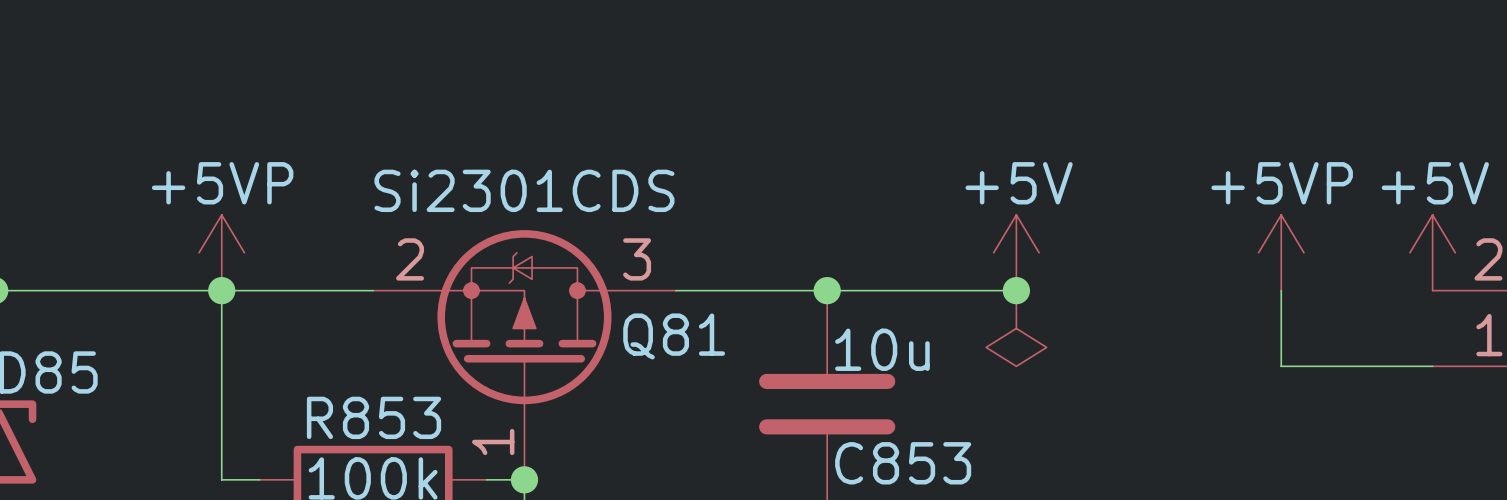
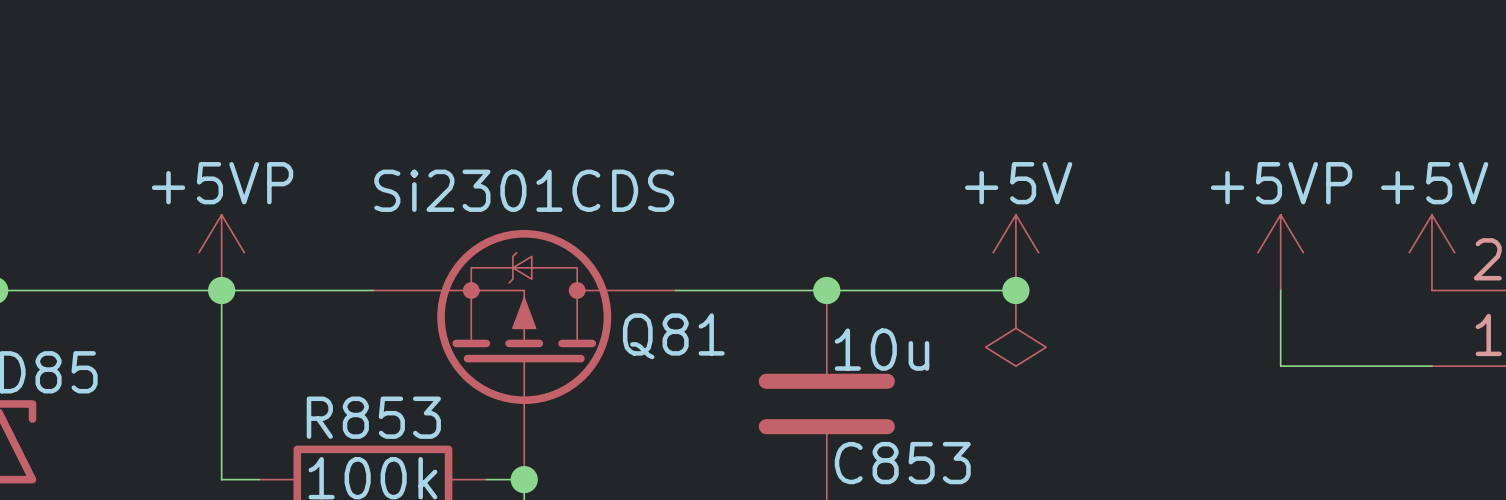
Q81 pin number: 2 (410, 259) -> none
Q81 pin number: 3 (637, 259) -> none
Q81 pin number: 1 (493, 442) -> none

